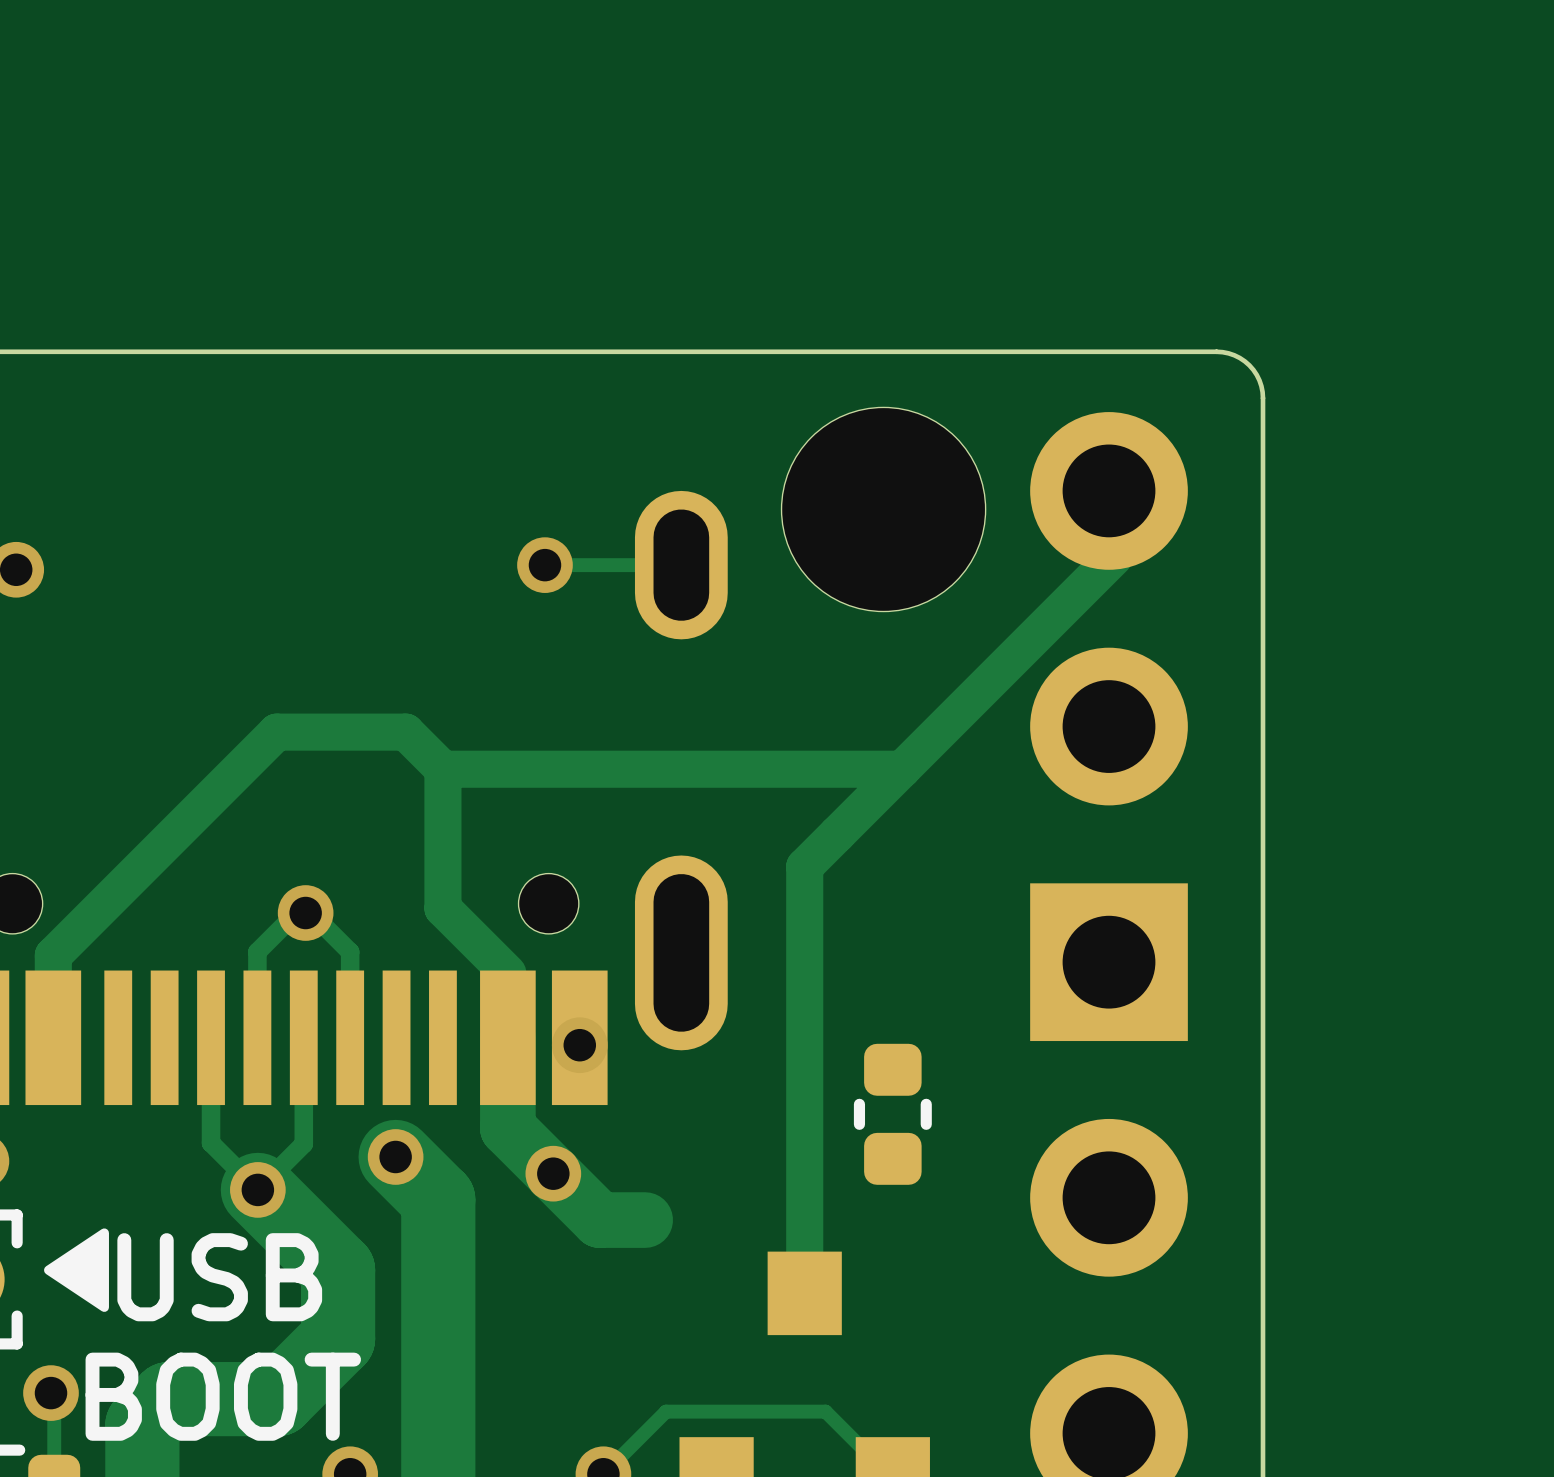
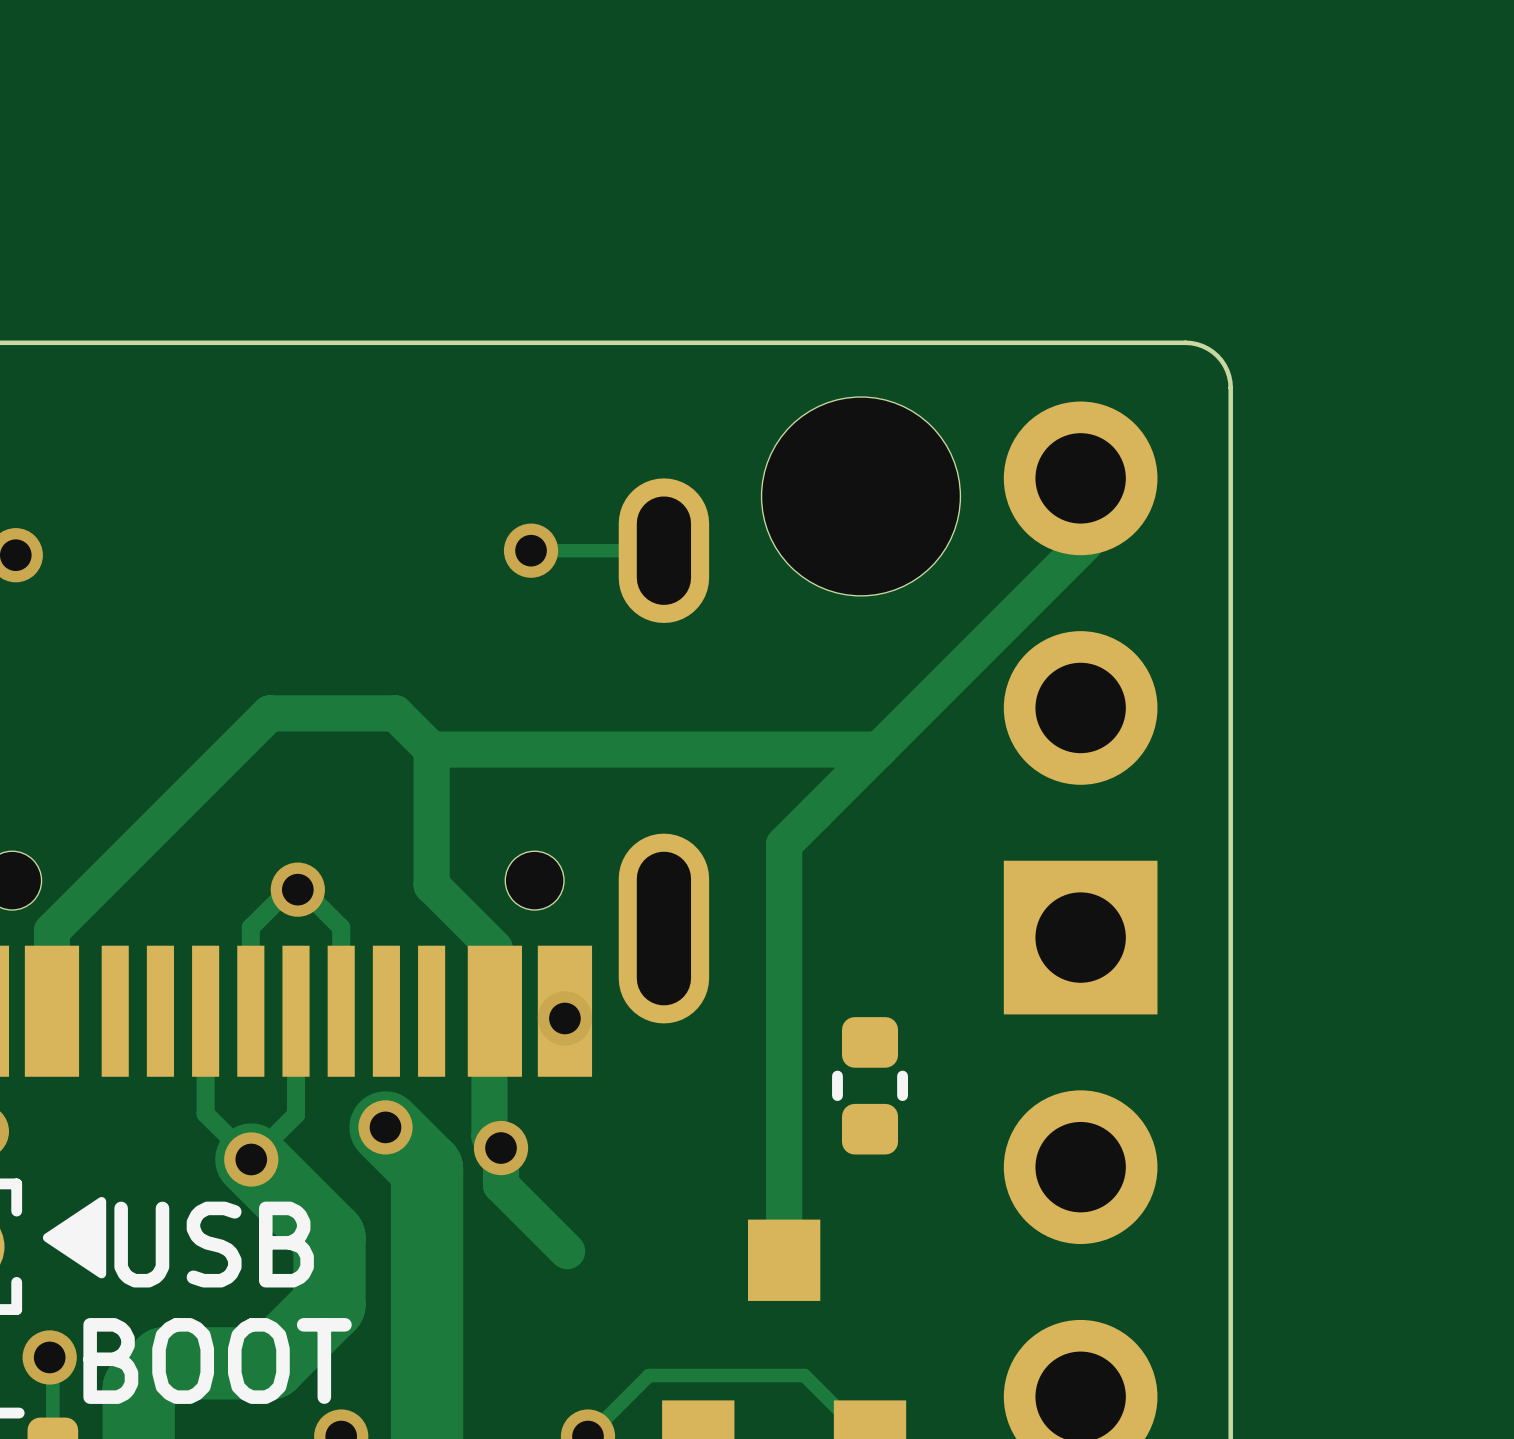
track: (507, 1037) (507, 1128) (599, 1220) (645, 1220) -> none
track: none -> (489, 1073) (489, 1136) (501, 1148) (501, 1185) (567, 1251)
via position: (553, 1173) -> (501, 1148)

